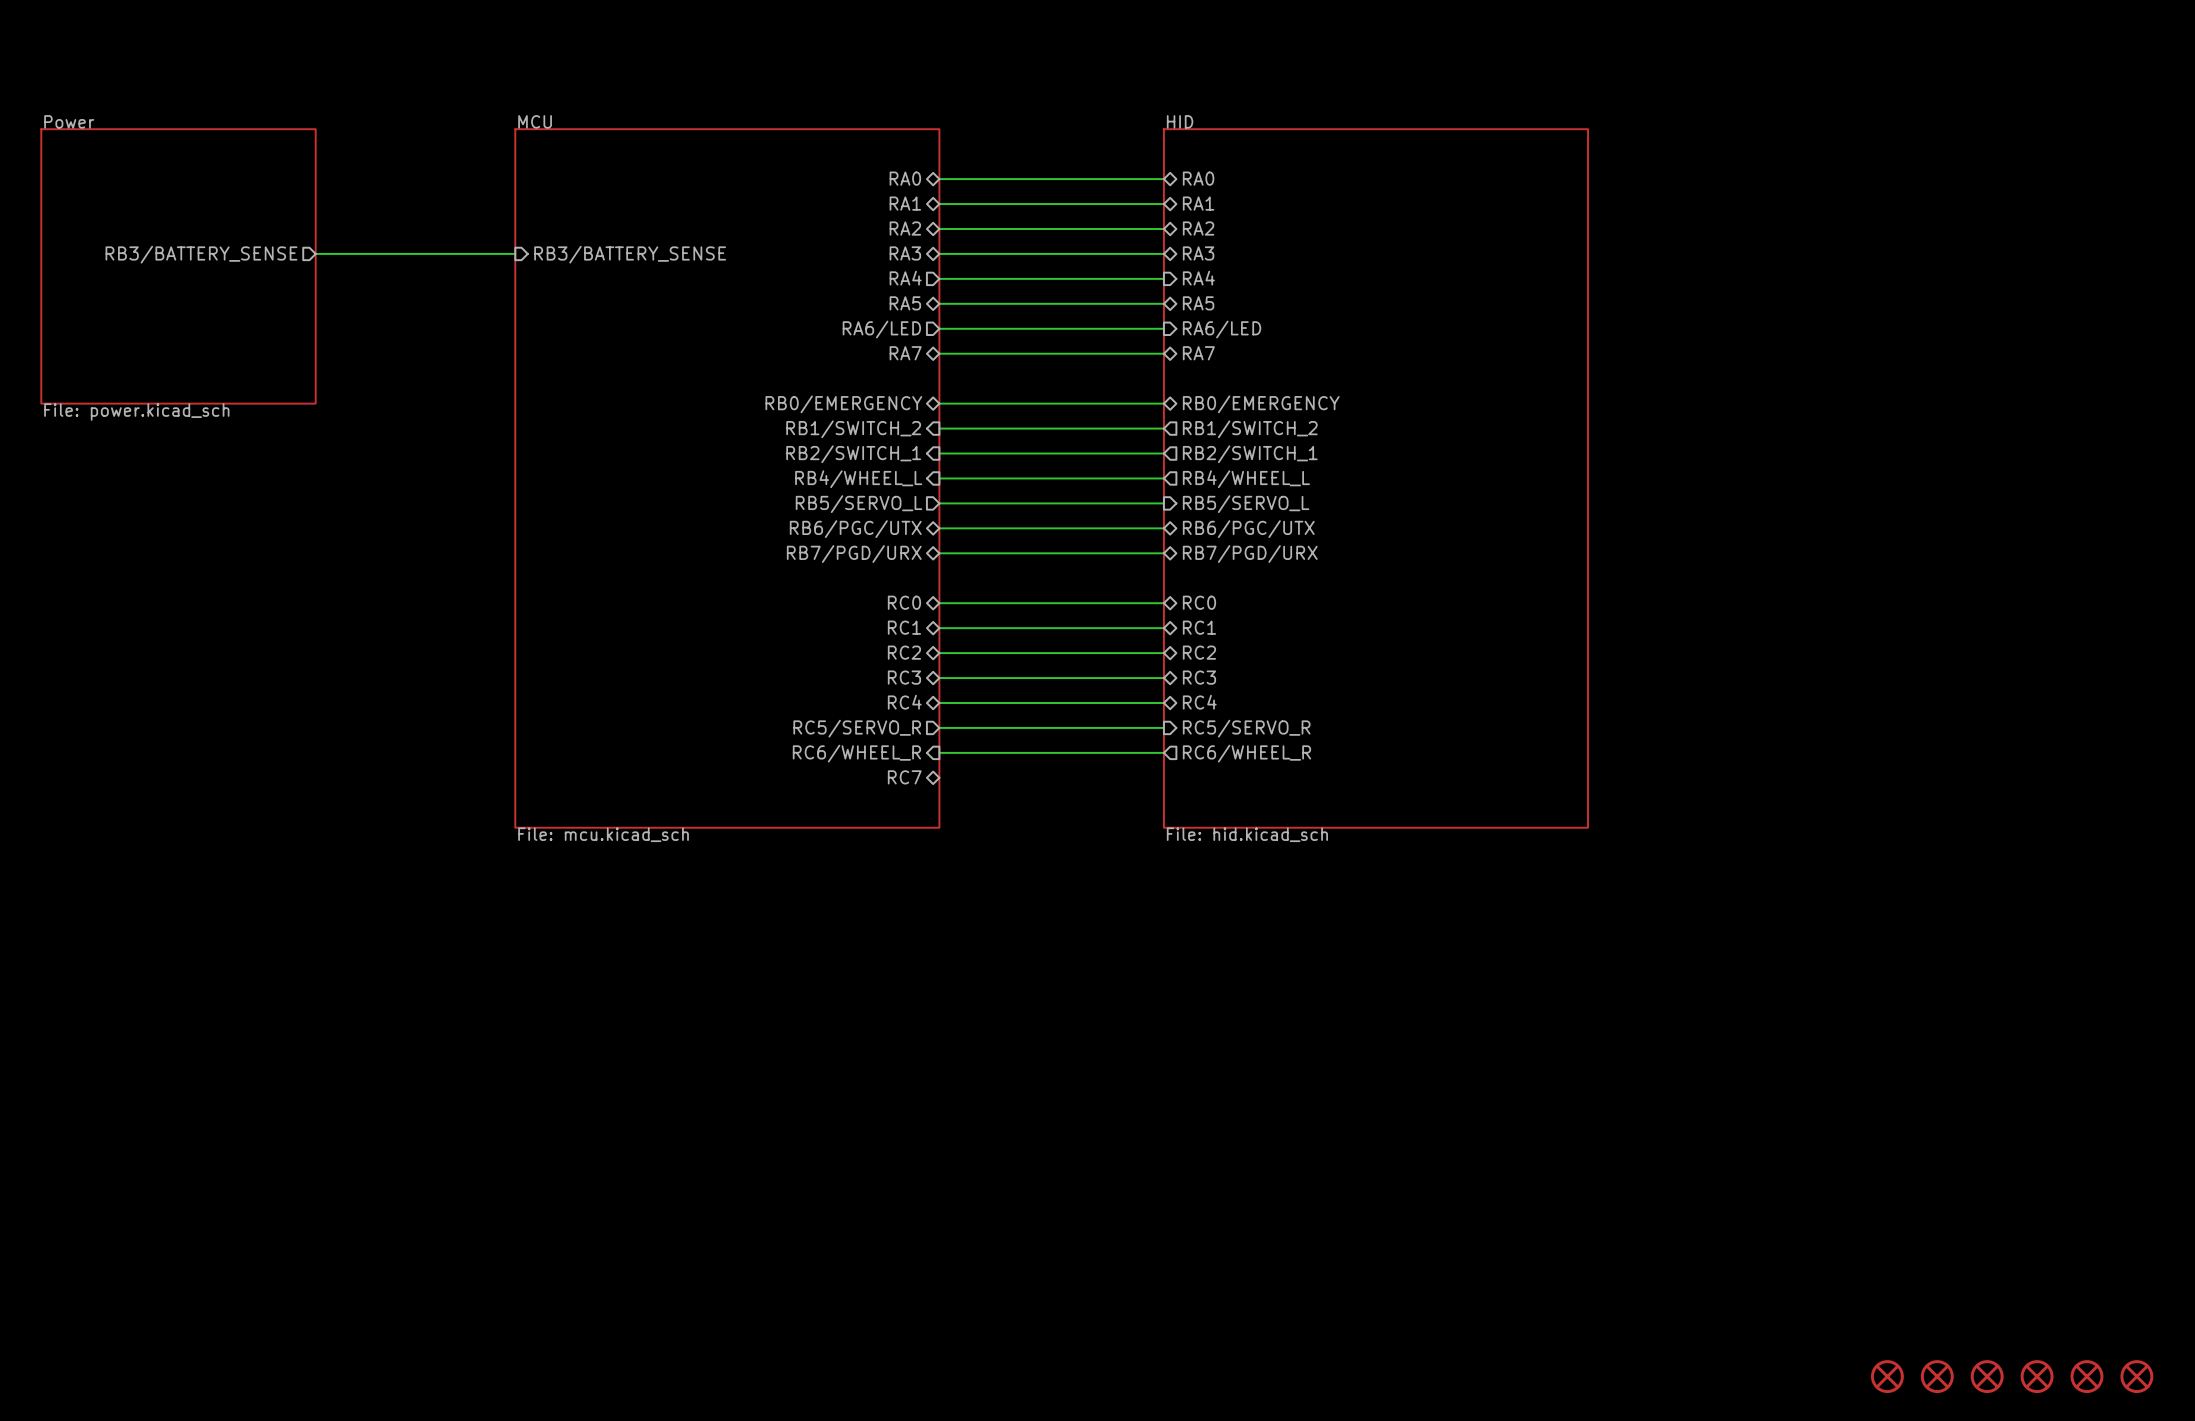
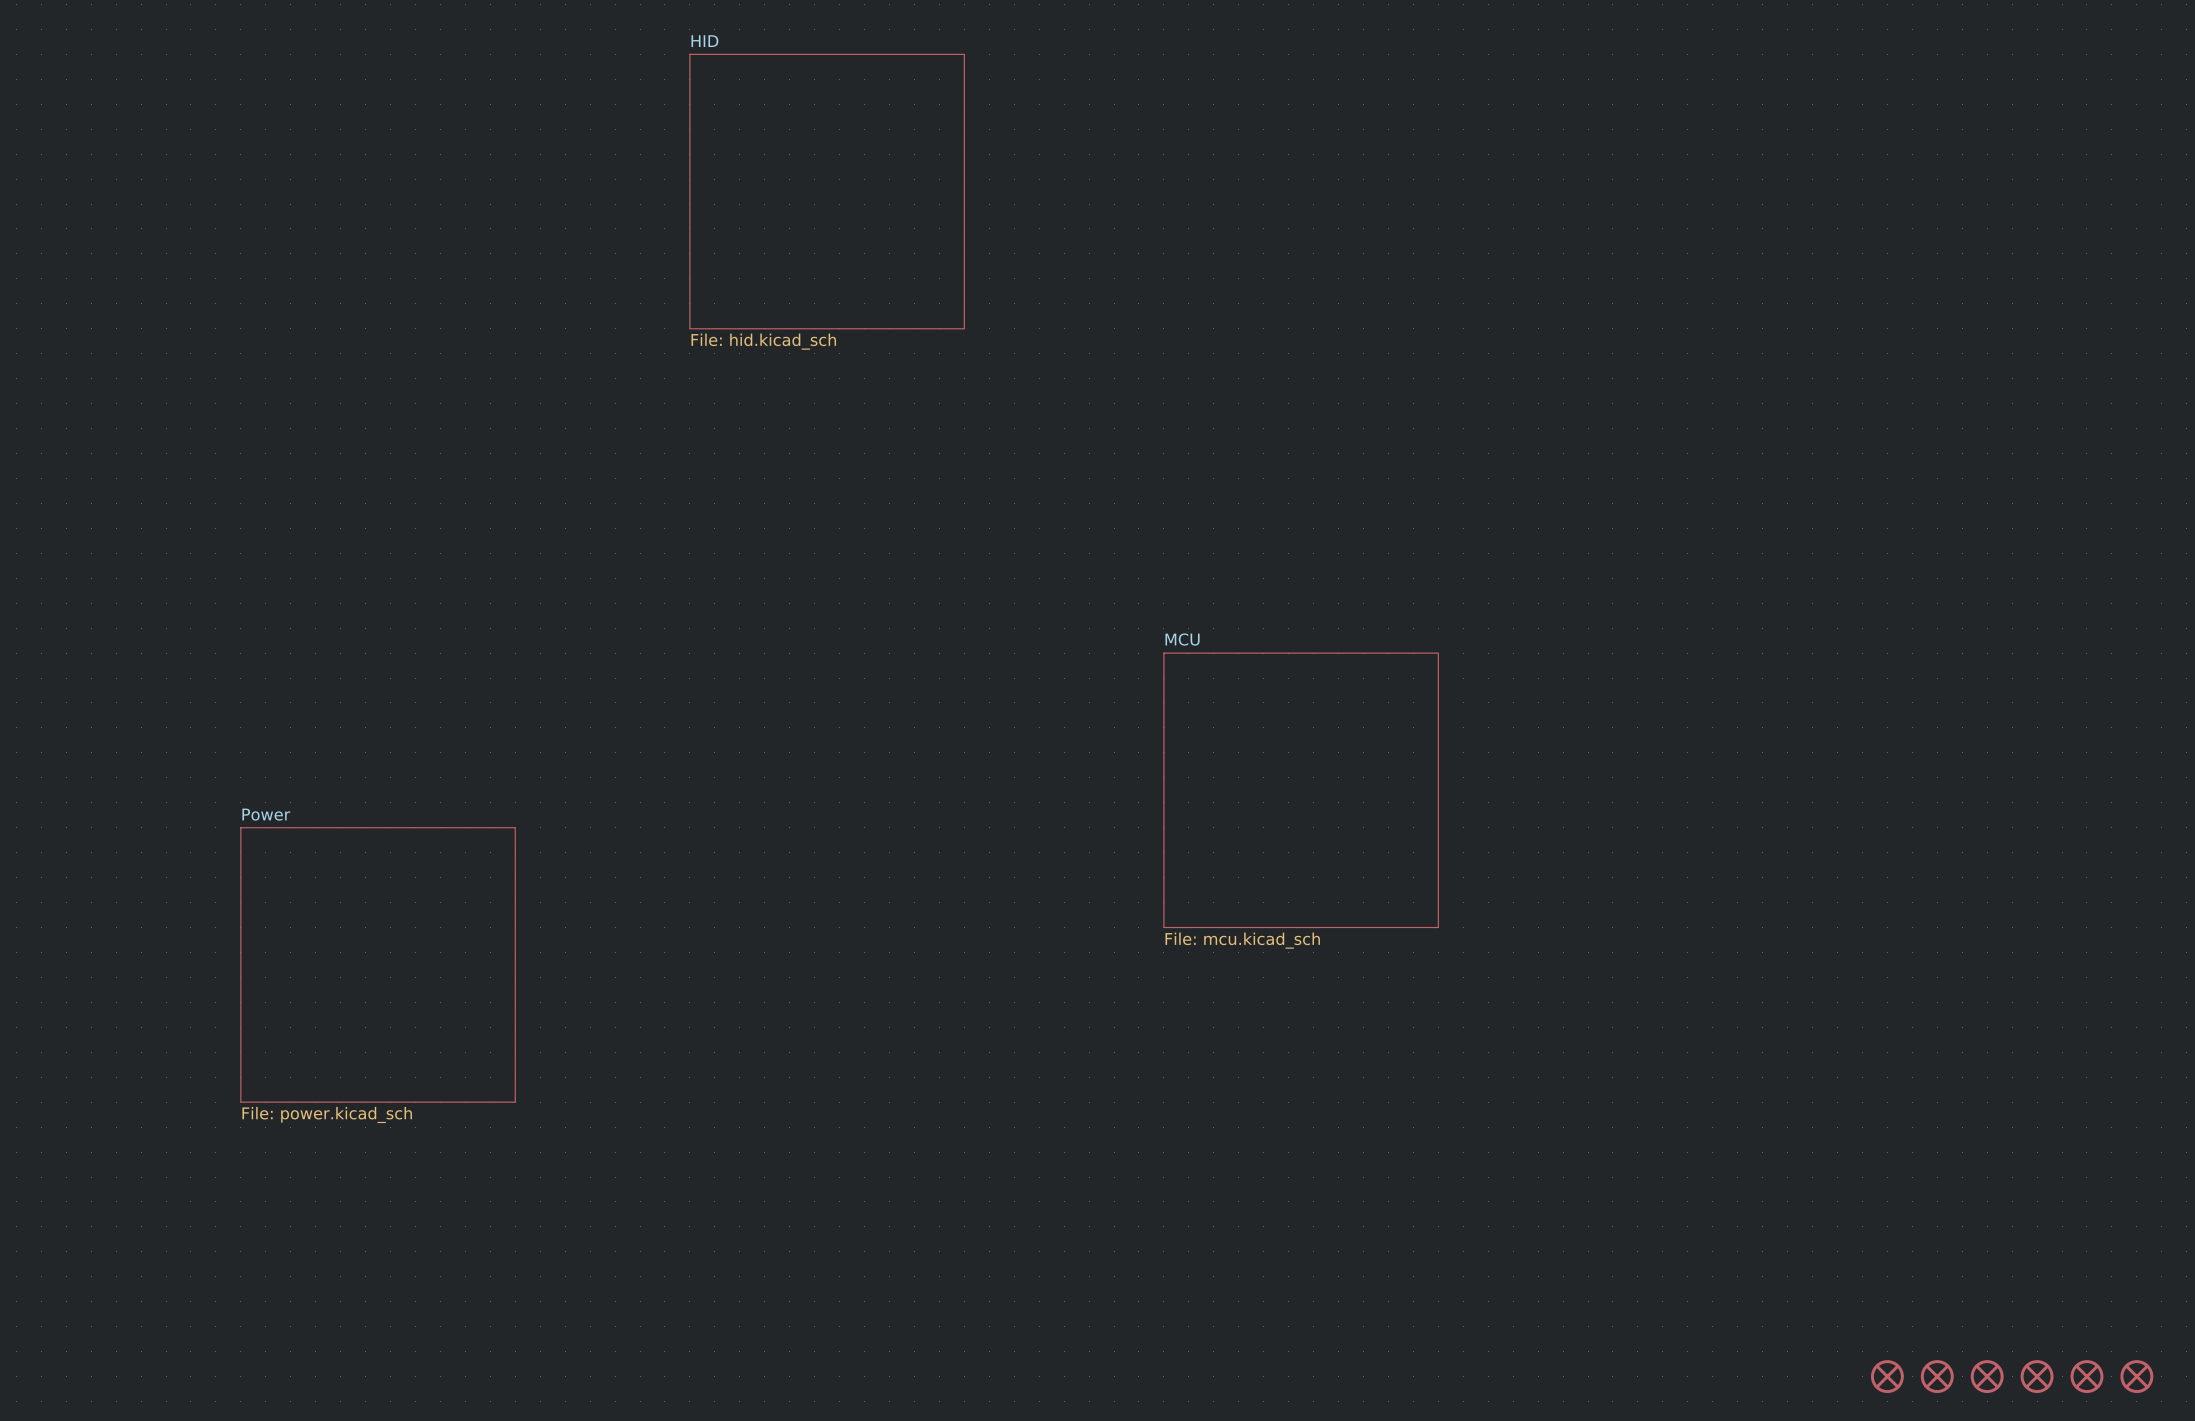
sheet pin: RA0 (905, 178) -> none
sheet pin: RA0 (1198, 178) -> none
wire: (939, 179) (1163, 179) -> none
sheet HID: none -> File: hid.kicad_sch (827, 191)
sheet pin: RA1 (905, 203) -> none
sheet pin: RA1 (1198, 203) -> none
wire: (939, 204) (1163, 204) -> none
sheet pin: RA2 (905, 228) -> none
wire: (939, 228) (1163, 228) -> none
sheet pin: RA2 (1198, 228) -> none
wire: (315, 253) (515, 253) -> none
sheet pin: RA3 (905, 253) -> none
wire: (939, 253) (1163, 253) -> none
sheet pin: RA3 (1198, 253) -> none
sheet pin: RB3/BATTERY_SENSE (201, 254) -> none
sheet pin: RB3/BATTERY_SENSE (630, 254) -> none
sheet Power: File: power.kicad_sch (178, 266) -> none
sheet pin: RA4 (905, 278) -> none
wire: (939, 278) (1163, 278) -> none
sheet pin: RA4 (1198, 278) -> none
sheet pin: RA5 (905, 303) -> none
wire: (939, 303) (1163, 303) -> none
sheet pin: RA5 (1198, 303) -> none
wire: (939, 328) (1163, 328) -> none
sheet pin: RA6/LED (881, 329) -> none
sheet pin: RA6/LED (1222, 329) -> none
sheet pin: RA7 (905, 353) -> none
wire: (939, 353) (1163, 353) -> none
sheet pin: RA7 (1198, 353) -> none
wire: (939, 403) (1163, 403) -> none
sheet pin: RB0/EMERGENCY (843, 404) -> none
sheet pin: RB0/EMERGENCY (1261, 404) -> none
wire: (939, 428) (1163, 428) -> none
sheet pin: RB1/SWITCH_2 (853, 429) -> none
sheet pin: RB1/SWITCH_2 (1250, 429) -> none
wire: (939, 453) (1163, 453) -> none
sheet pin: RB2/SWITCH_1 (853, 454) -> none
sheet pin: RB2/SWITCH_1 (1250, 454) -> none
sheet MCU: File: mcu.kicad_sch (727, 478) -> none
wire: (939, 478) (1163, 478) -> none
sheet HID: File: hid.kicad_sch (1375, 478) -> none
sheet pin: RB4/WHEEL_L (858, 479) -> none
sheet pin: RB4/WHEEL_L (1246, 479) -> none
wire: (939, 503) (1163, 503) -> none
sheet pin: RB5/SERVO_L (859, 504) -> none
sheet pin: RB5/SERVO_L (1246, 504) -> none
wire: (939, 528) (1163, 528) -> none
sheet pin: RB6/PGC/UTX (855, 529) -> none
sheet pin: RB6/PGC/UTX (1248, 529) -> none
wire: (939, 553) (1163, 553) -> none
sheet pin: RB7/PGD/URX (854, 554) -> none
sheet pin: RB7/PGD/URX (1250, 554) -> none
sheet pin: RC0 (904, 602) -> none
sheet pin: RC0 (1199, 602) -> none
wire: (939, 603) (1163, 603) -> none
sheet pin: RC1 (904, 627) -> none
sheet pin: RC1 (1199, 627) -> none
wire: (939, 628) (1163, 628) -> none
sheet pin: RC2 (904, 652) -> none
sheet pin: RC2 (1199, 652) -> none
wire: (939, 653) (1163, 653) -> none
sheet pin: RC3 (904, 677) -> none
sheet pin: RC3 (1199, 677) -> none
wire: (939, 678) (1163, 678) -> none
sheet pin: RC4 (904, 702) -> none
wire: (939, 702) (1163, 702) -> none
sheet pin: RC4 (1199, 702) -> none
wire: (939, 727) (1163, 727) -> none
sheet pin: RC5/SERVO_R (857, 728) -> none
sheet pin: RC5/SERVO_R (1246, 728) -> none
wire: (939, 752) (1163, 752) -> none
sheet pin: RC6/WHEEL_R (856, 753) -> none
sheet pin: RC6/WHEEL_R (1246, 753) -> none
sheet pin: RC7 (904, 777) -> none
sheet MCU: none -> File: mcu.kicad_sch (1301, 790)
sheet Power: none -> File: power.kicad_sch (378, 964)

